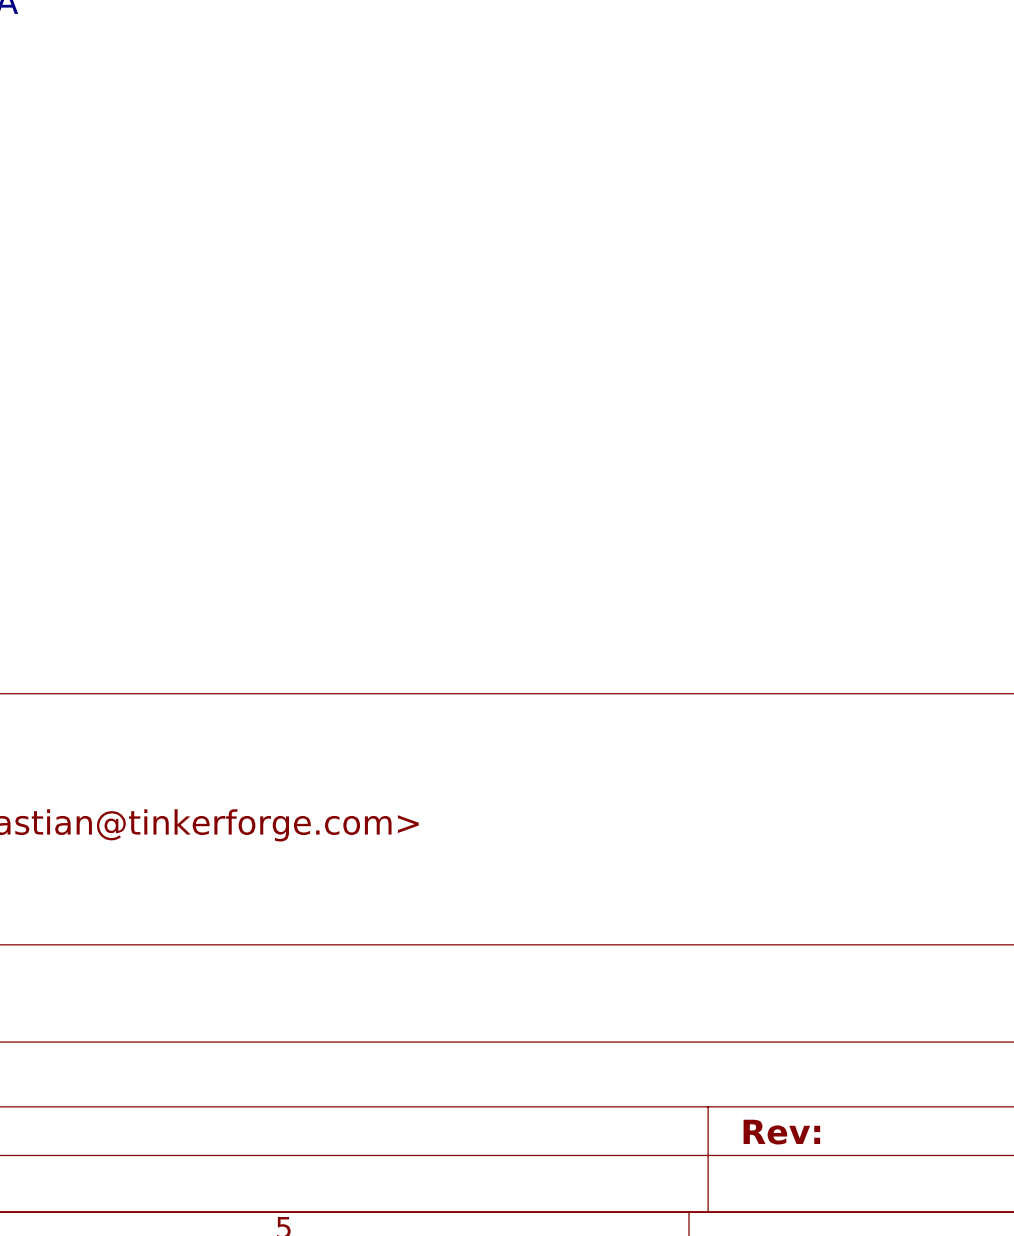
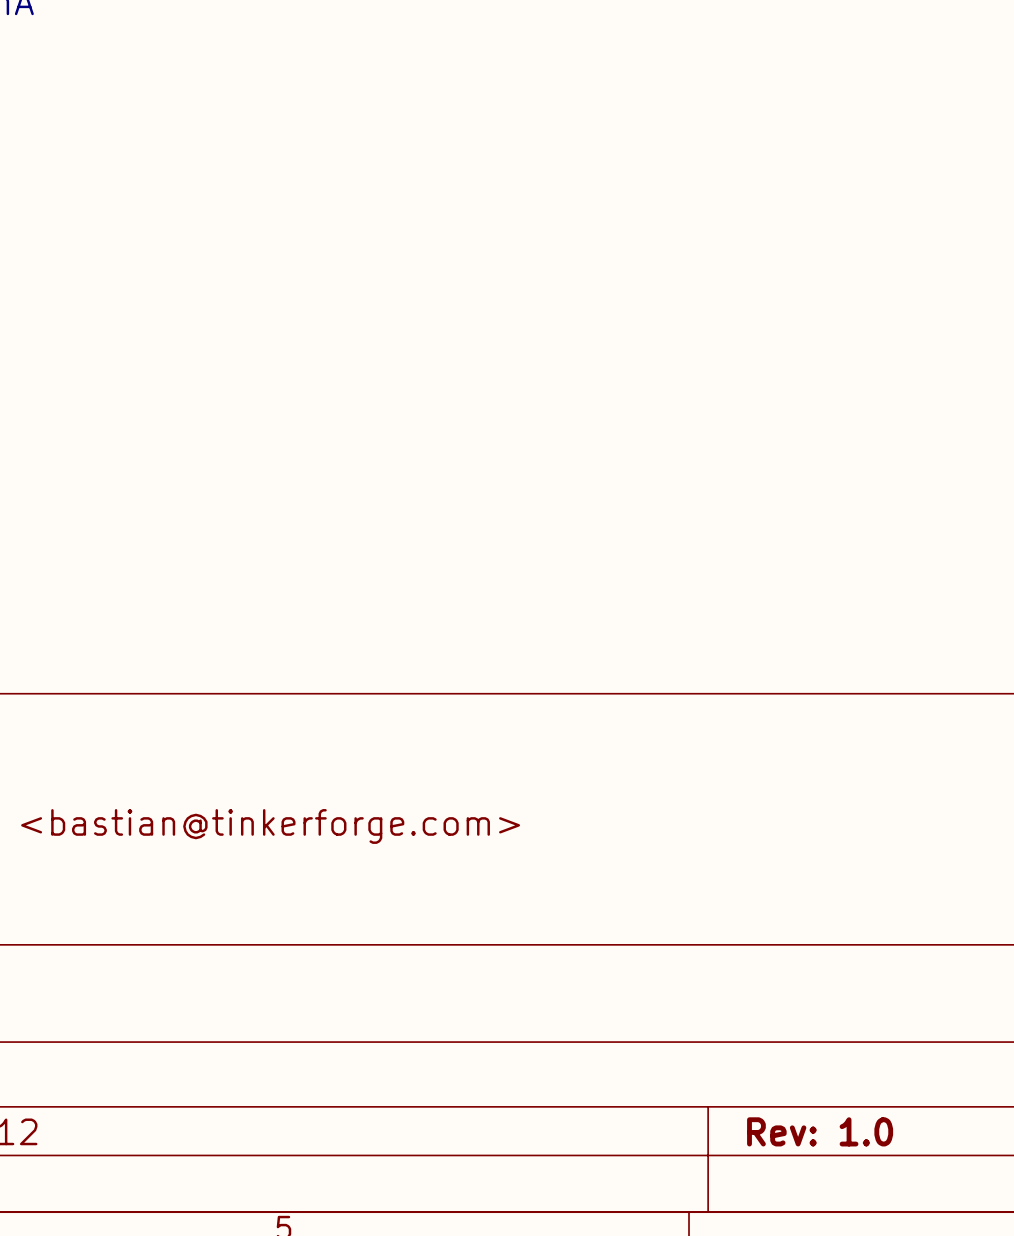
title block: Rev: (781, 1132) -> Rev: 1.0 (820, 1131)

